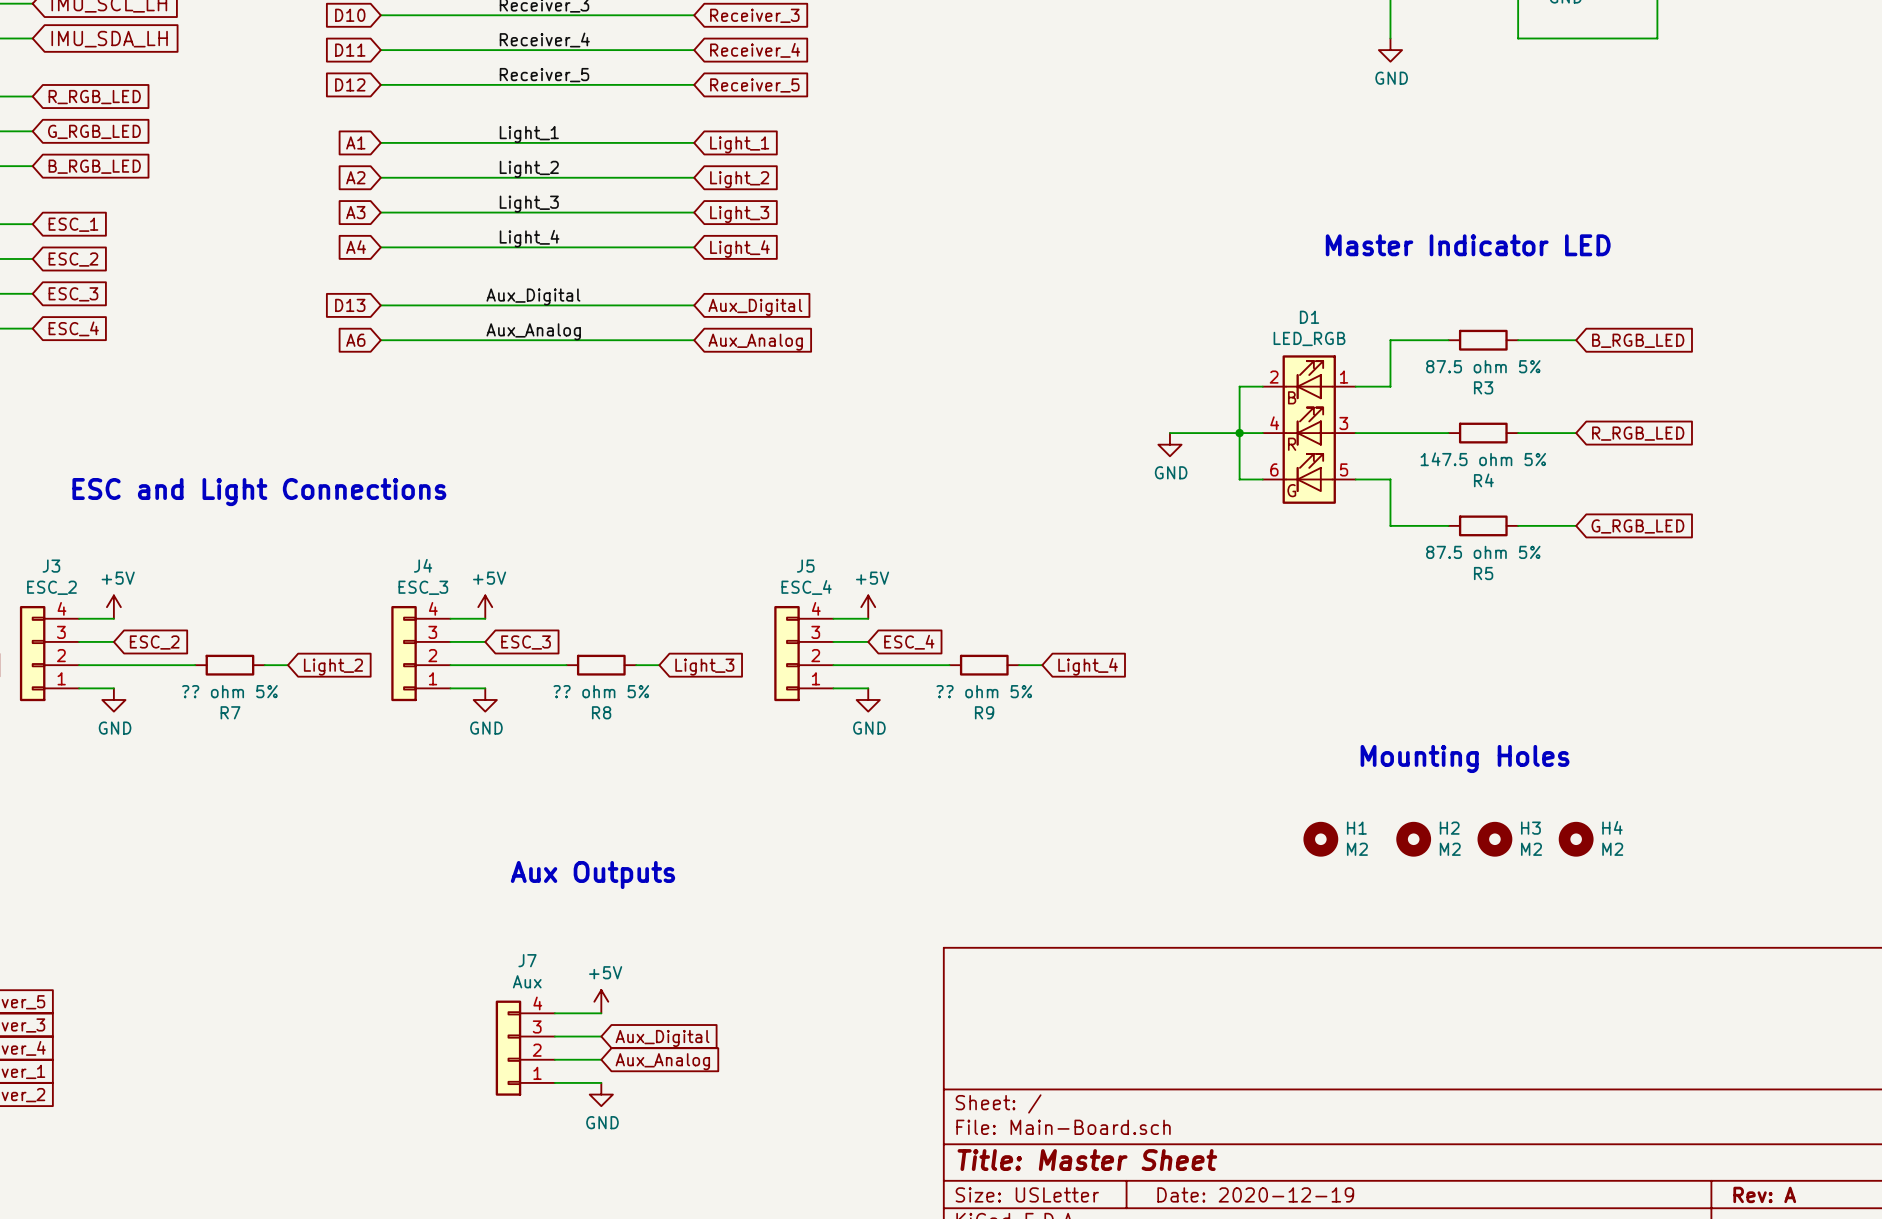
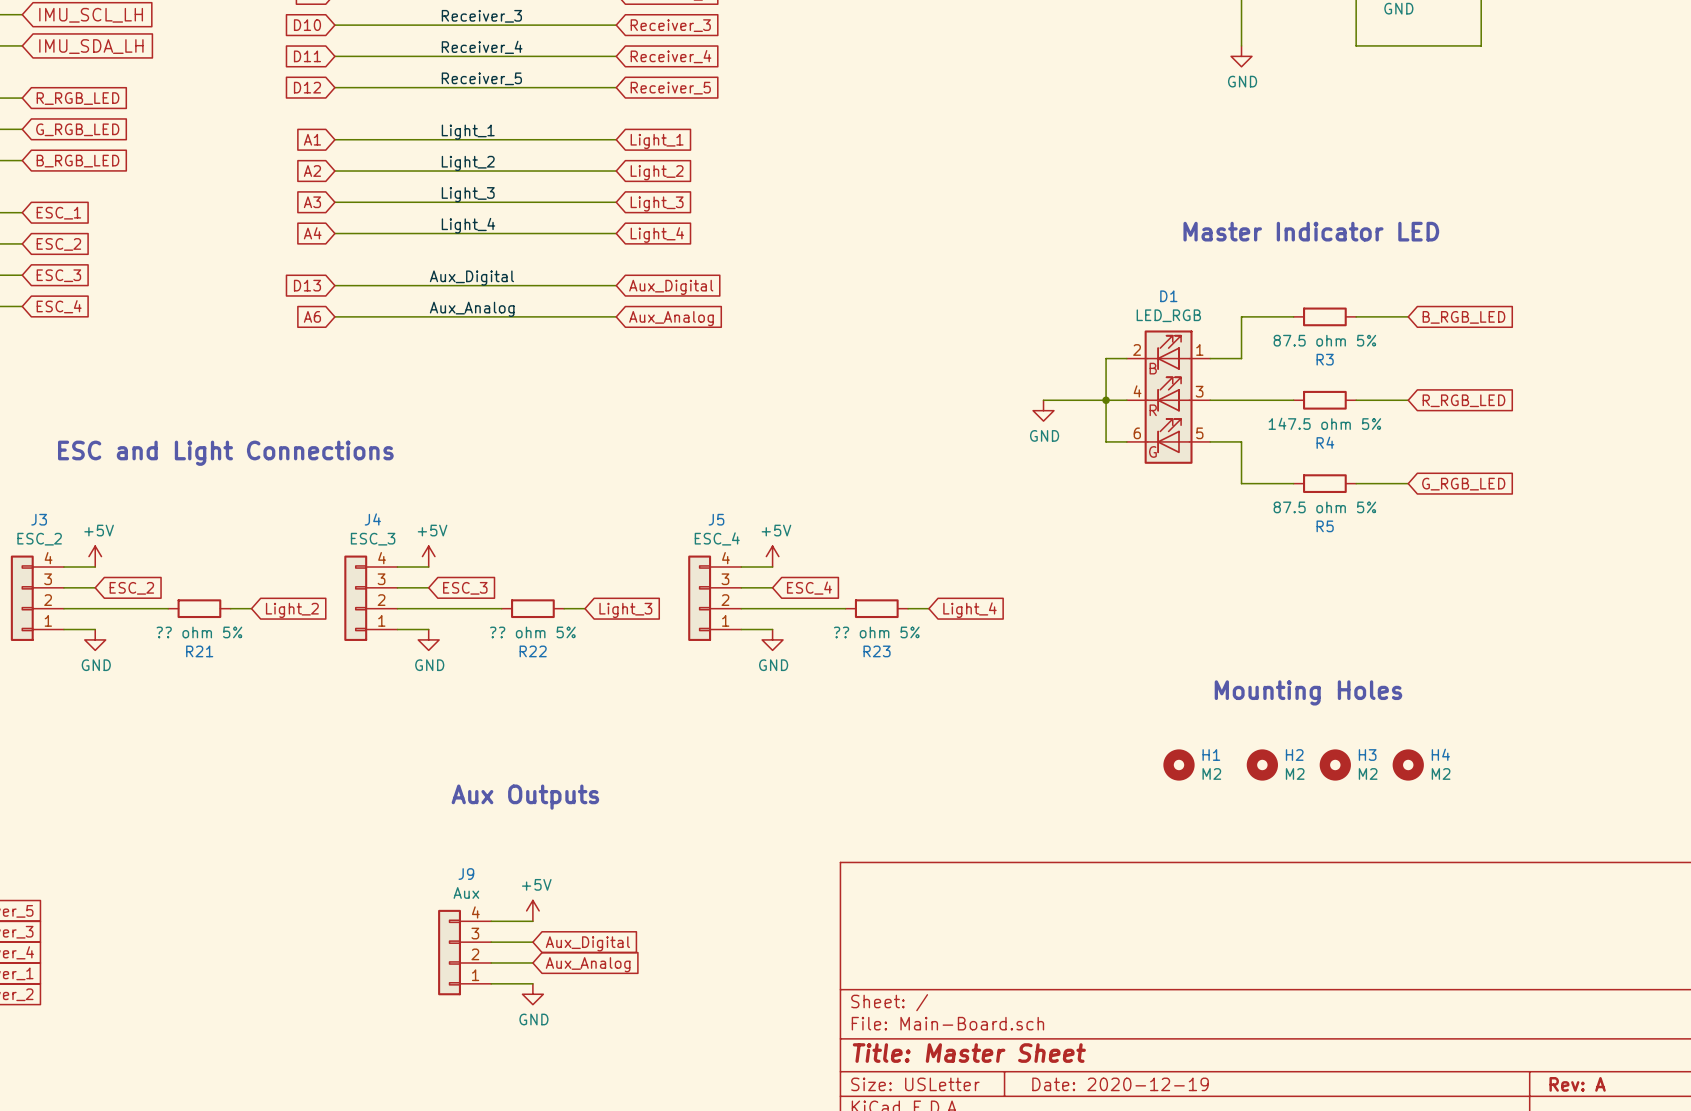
R7 name: R7 (230, 712) -> R21 (199, 651)
R8 name: R8 (601, 712) -> R22 (533, 651)
R9 name: R9 (984, 712) -> R23 (877, 651)
J7 name: J7 (527, 960) -> J9 (466, 874)

